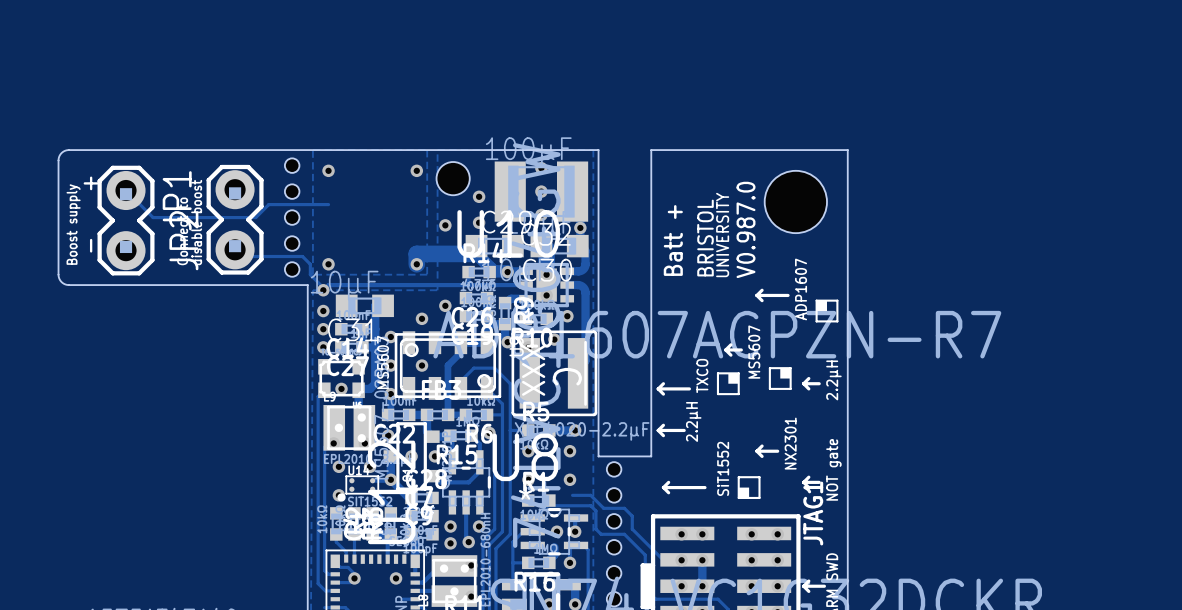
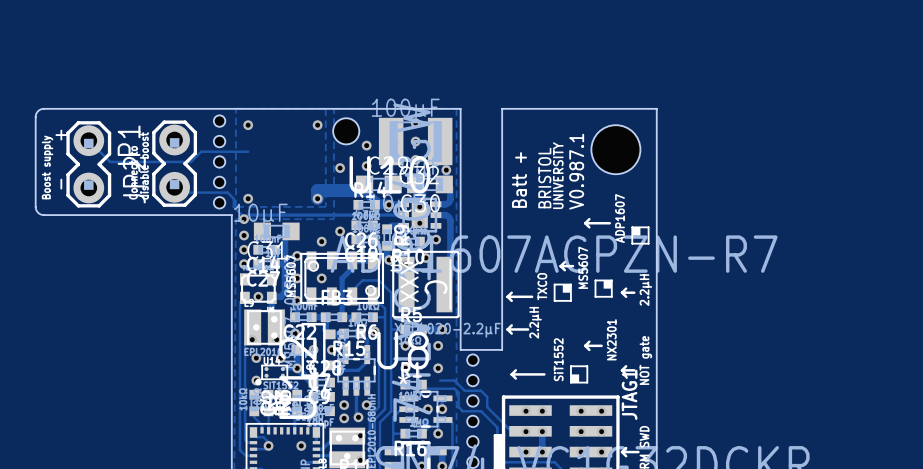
text: V0.987.0 (746, 229) -> V0.987.1 (576, 171)

